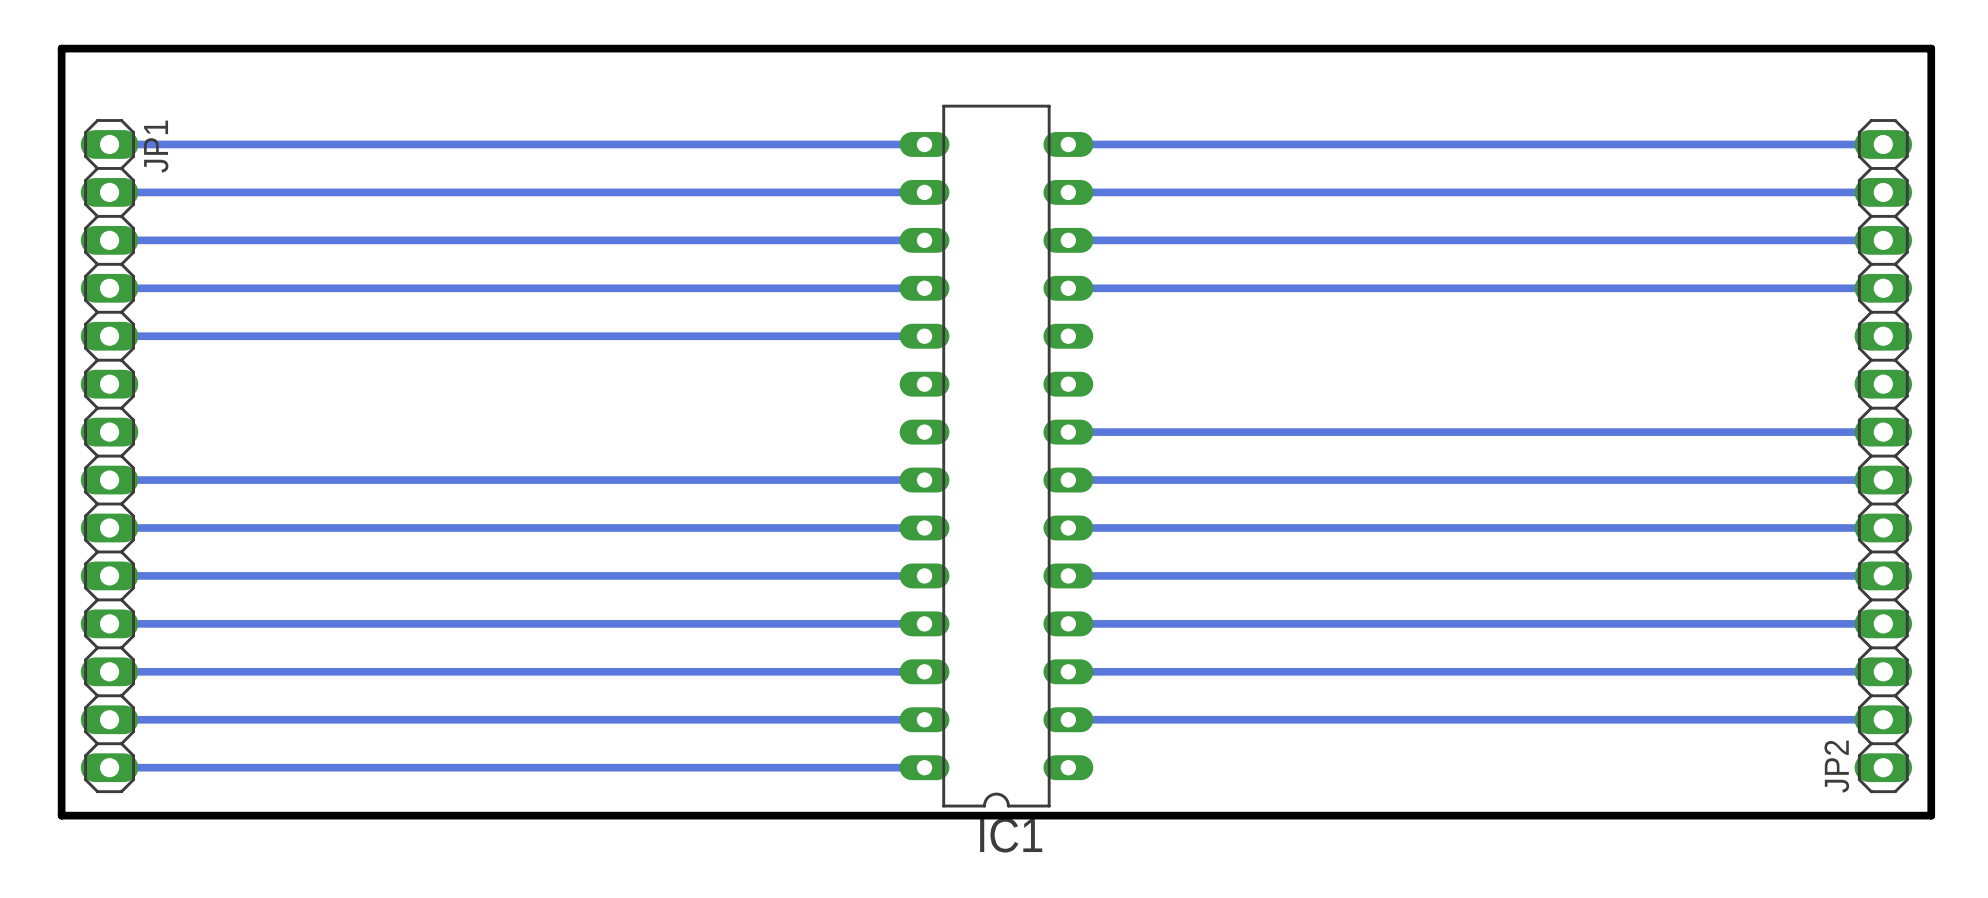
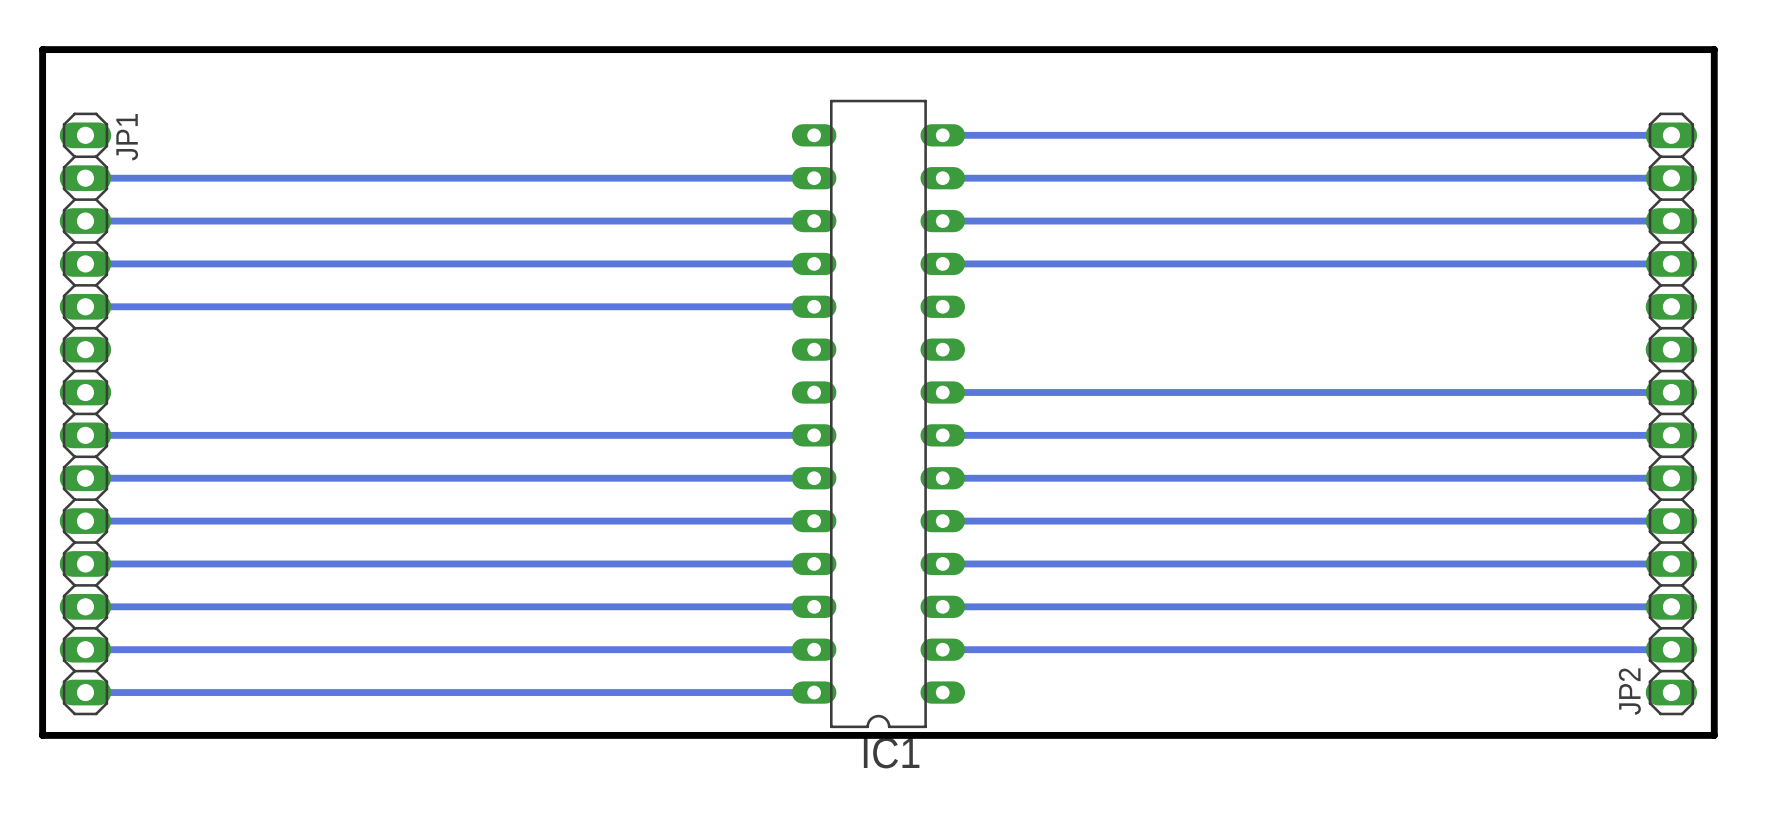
bottom track: (109, 144) (924, 144) -> none

